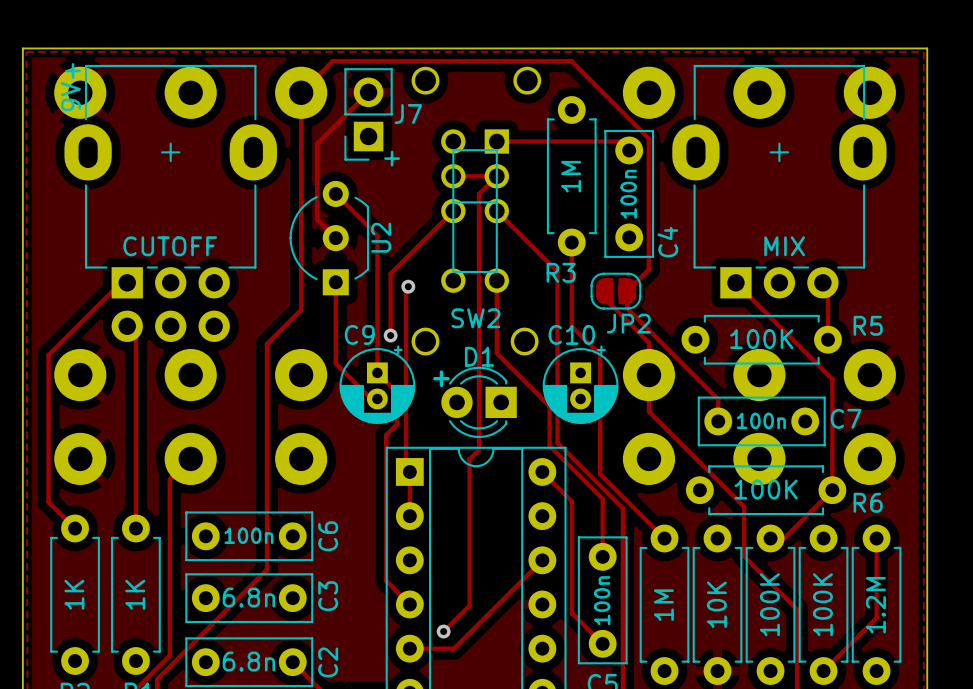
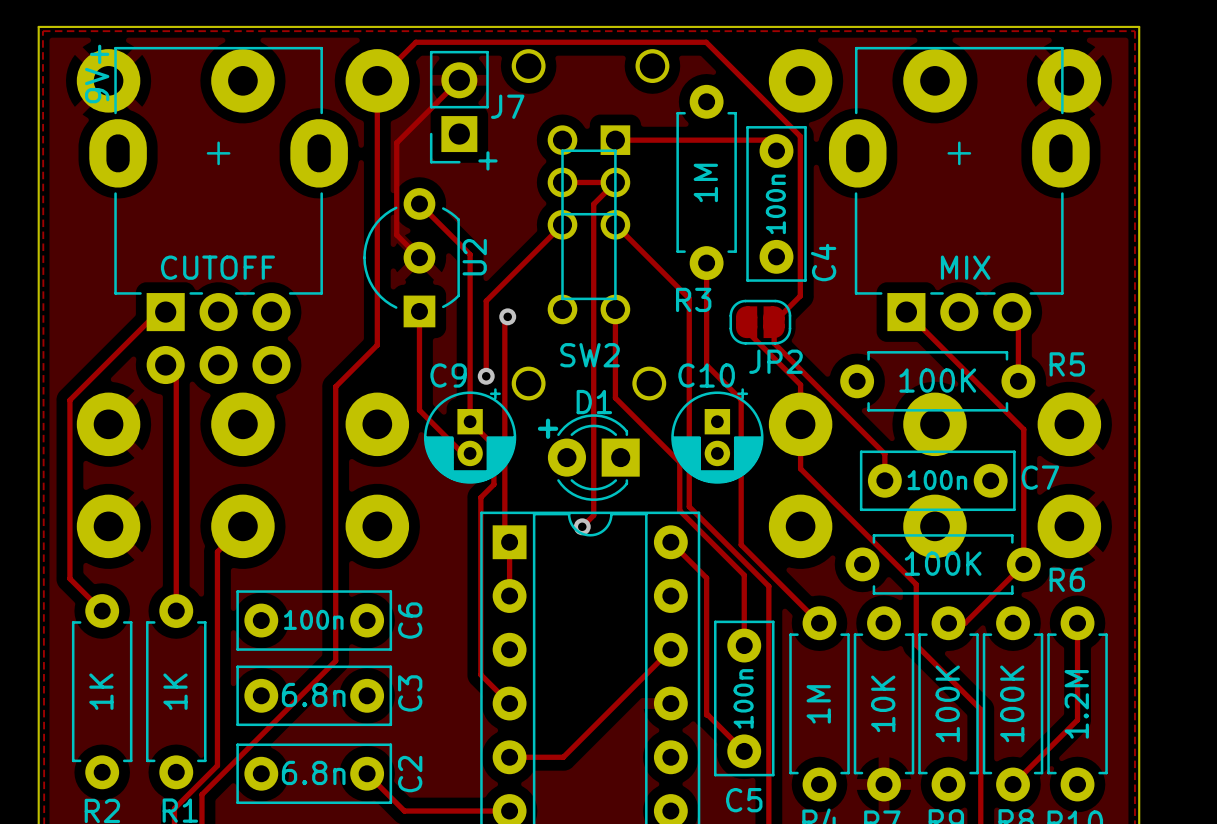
track: (469, 459) (469, 605) (443, 631) -> none
via: none -> (582, 526)
via: (443, 631) -> none

